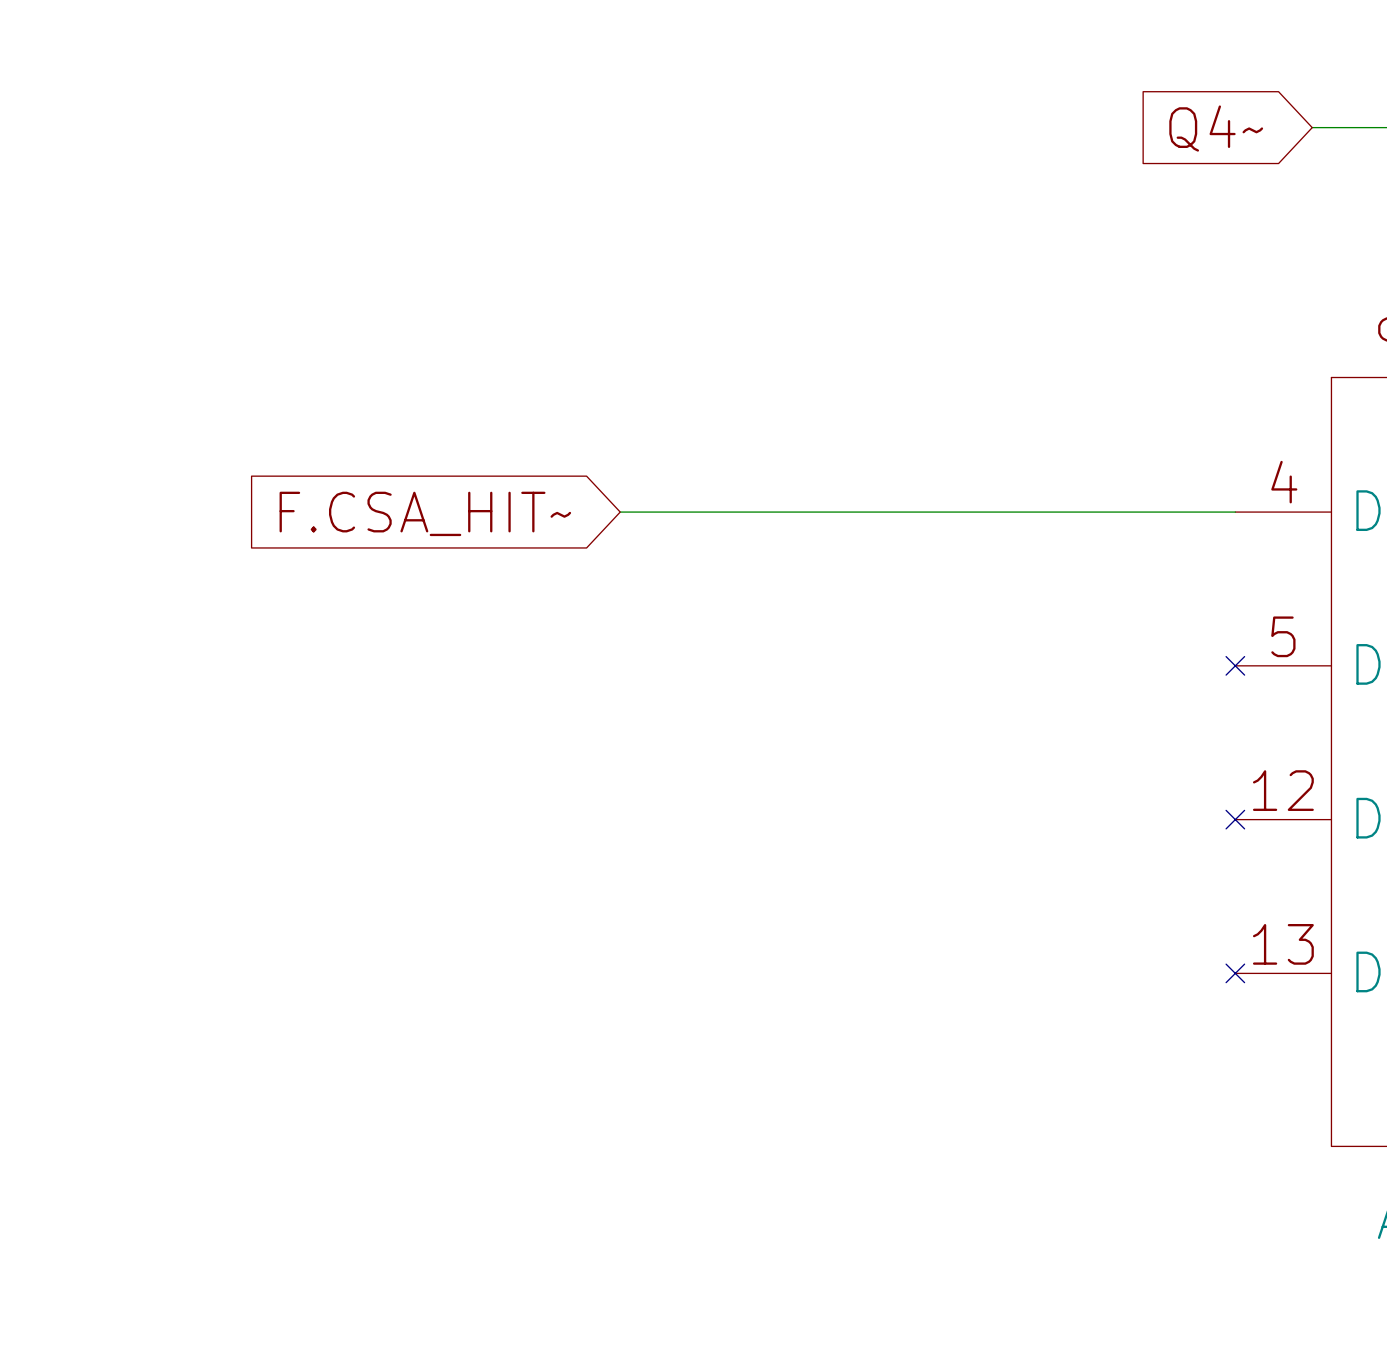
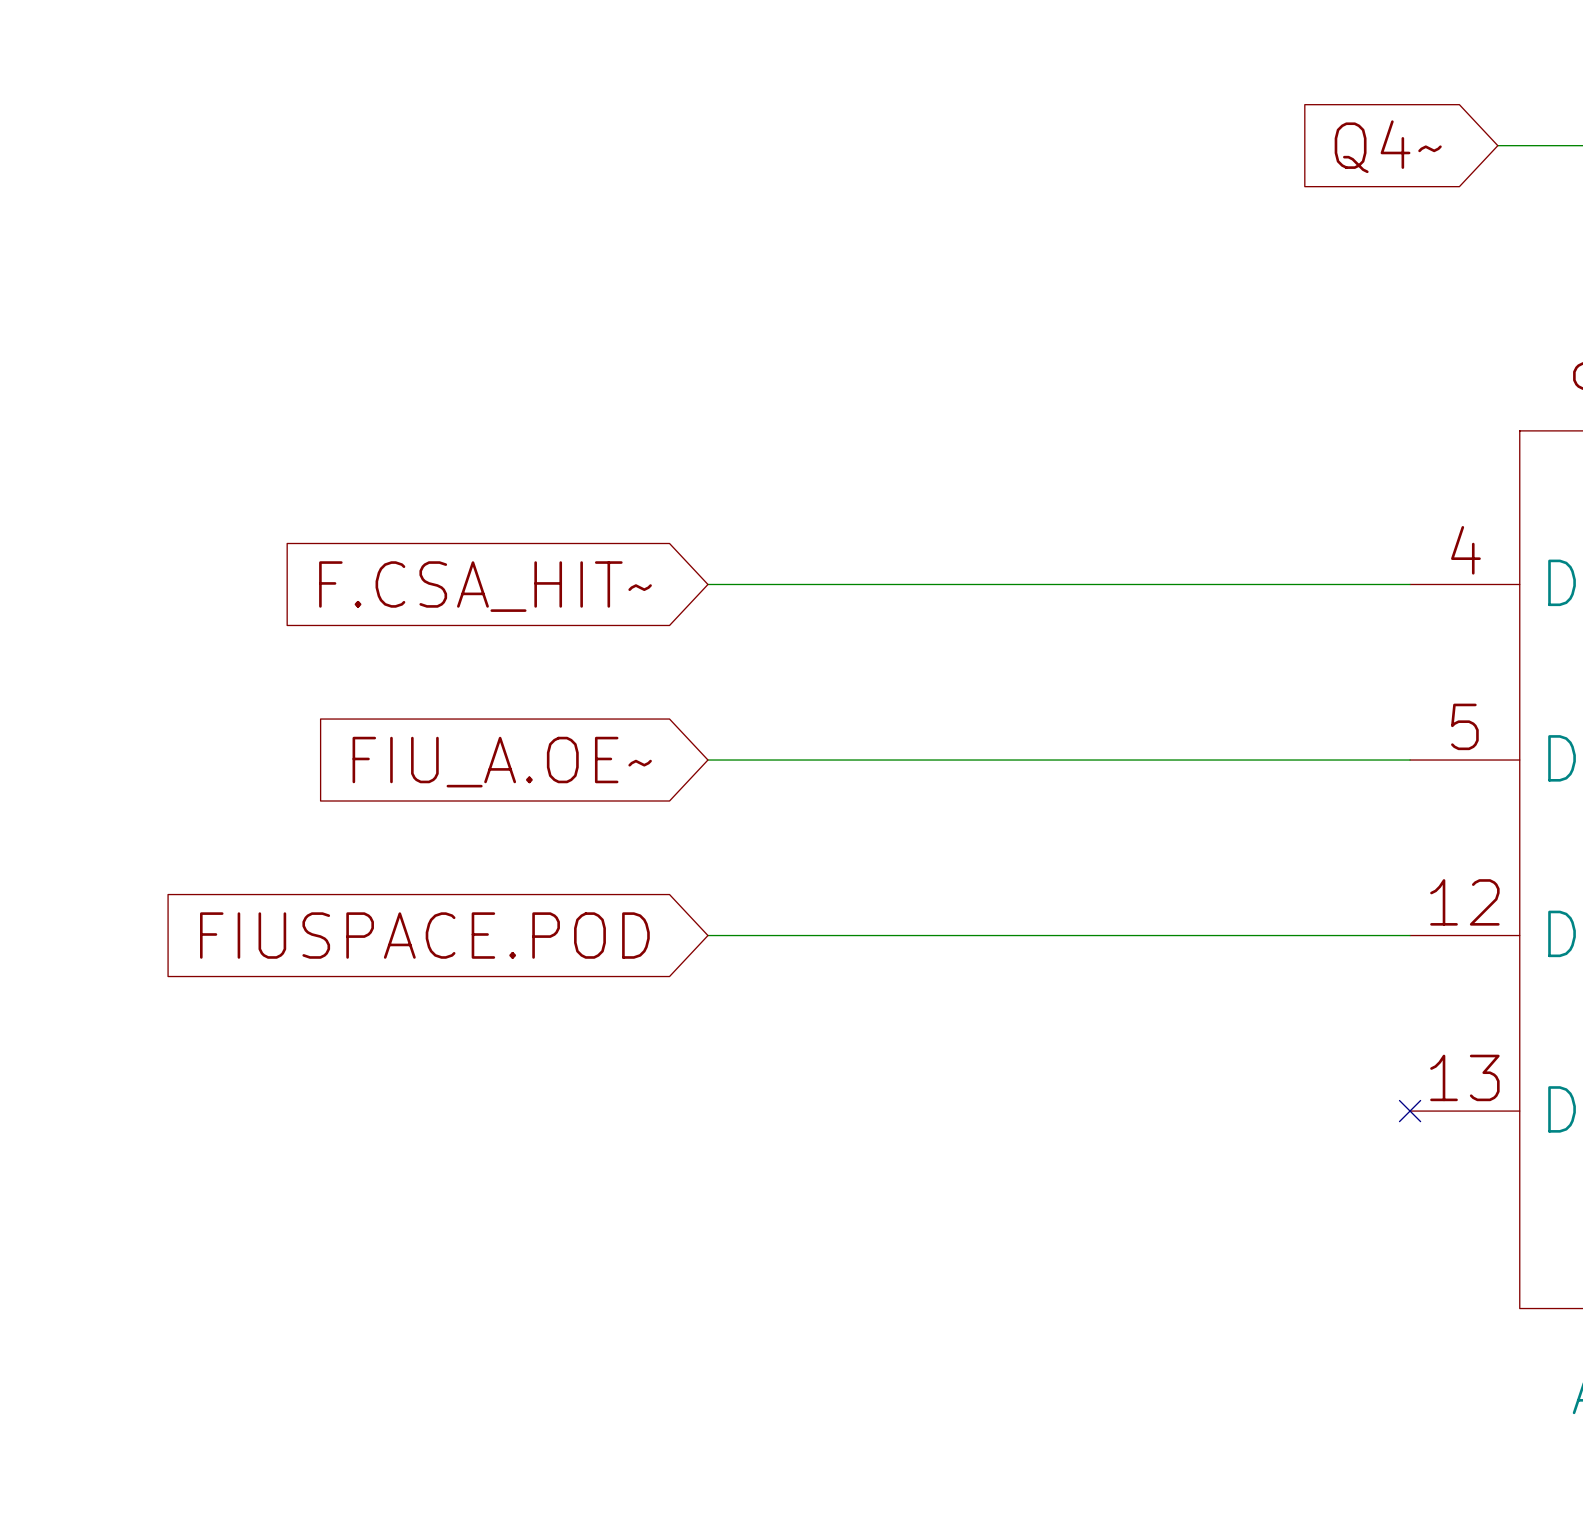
wire: none -> (707, 760) (1410, 760)
no-connect mark: (1235, 665) -> none
global label: none -> FIU_A.OE~ (502, 762)
global label: none -> FIUSPACE.POD (424, 935)
wire: none -> (707, 935) (1410, 935)
no-connect mark: (1235, 819) -> none

